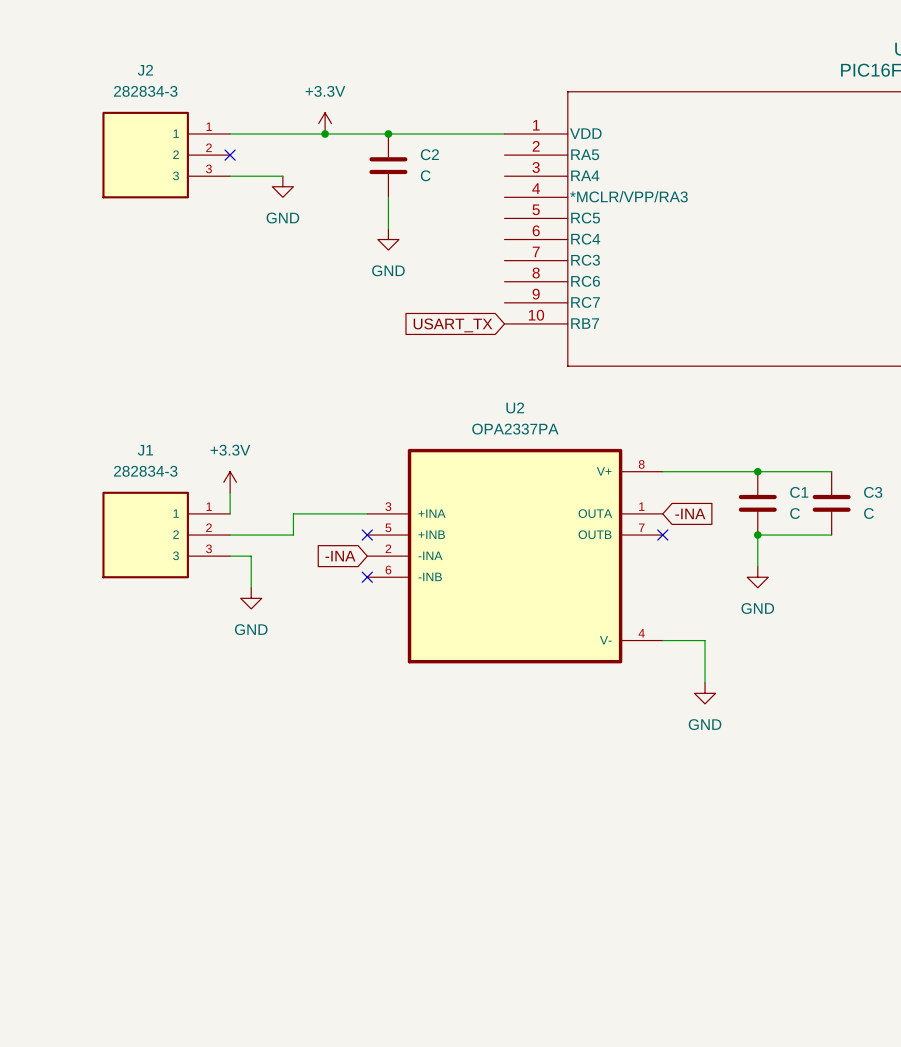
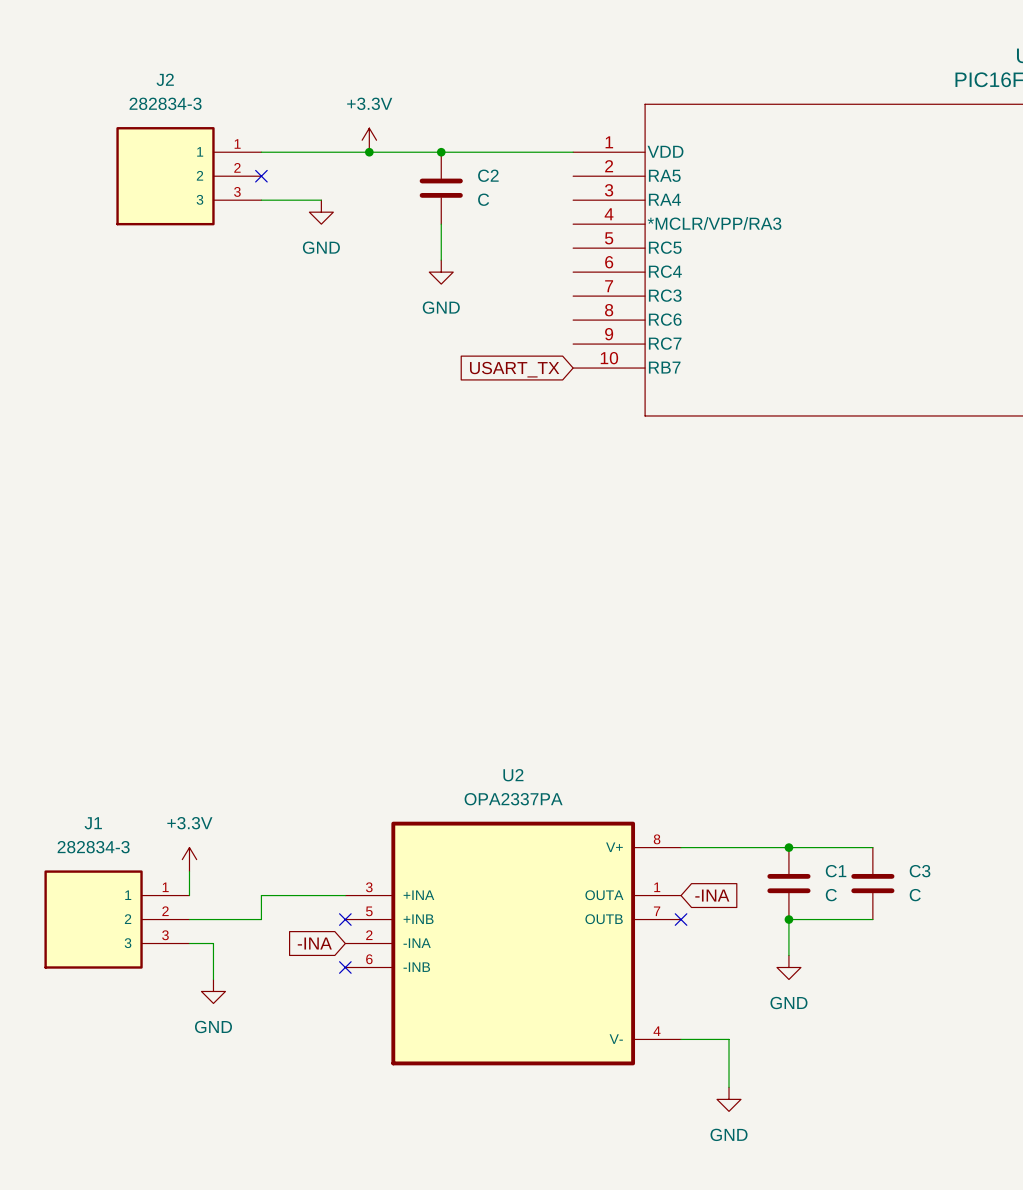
wire: (662, 471) (831, 471) -> none
junction: (757, 471) -> none
power symbol: +3.3V (230, 482) -> none
wire: (230, 492) (230, 513) -> none
C1 position: (757, 503) -> (788, 883)
C3 position: (831, 503) -> (872, 883)
wire: (367, 513) (293, 513) (293, 535) (230, 535) -> none
global label: -INA (690, 513) -> none
J1 position: (166, 535) -> (116, 919)
no-connect mark: (367, 535) -> none
no-connect mark: (662, 535) -> none
junction: (757, 535) -> none
wire: (831, 535) (757, 535) (757, 566) -> none
wire: (230, 556) (251, 556) (251, 587) -> none
global label: -INA (340, 556) -> none
U2 position: (515, 556) -> (513, 943)
no-connect mark: (367, 577) -> none
power symbol: GND (757, 577) -> none
power symbol: GND (251, 598) -> none
wire: (662, 640) (705, 640) (705, 682) -> none
power symbol: GND (705, 693) -> none
wire: none -> (681, 847) (872, 847)
junction: none -> (788, 847)
power symbol: none -> +3.3V (189, 859)
wire: none -> (189, 871) (189, 895)
wire: none -> (345, 895) (261, 895) (261, 919) (189, 919)
global label: none -> -INA (712, 895)
no-connect mark: none -> (345, 919)
no-connect mark: none -> (681, 919)
junction: none -> (788, 919)
wire: none -> (872, 919) (788, 919) (788, 955)
wire: none -> (189, 943) (213, 943) (213, 979)
global label: none -> -INA (314, 943)
no-connect mark: none -> (345, 967)
power symbol: none -> GND (788, 967)
power symbol: none -> GND (213, 991)
wire: none -> (681, 1039) (729, 1039) (729, 1087)
power symbol: none -> GND (729, 1099)

